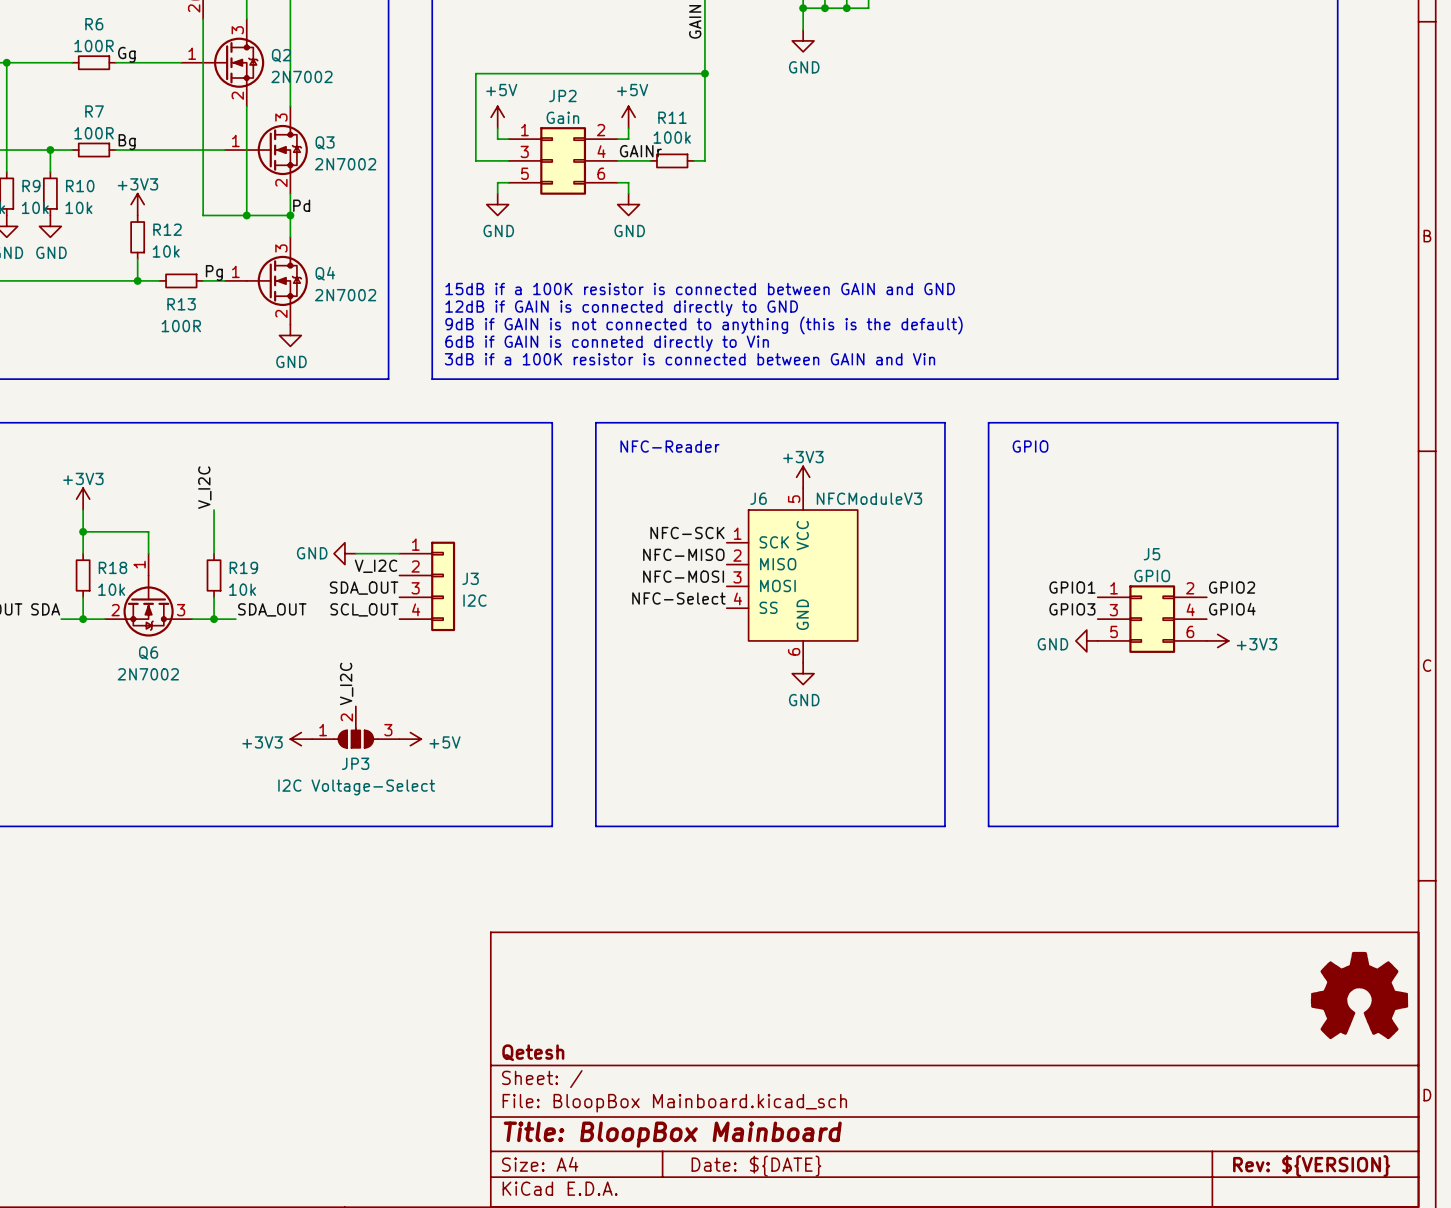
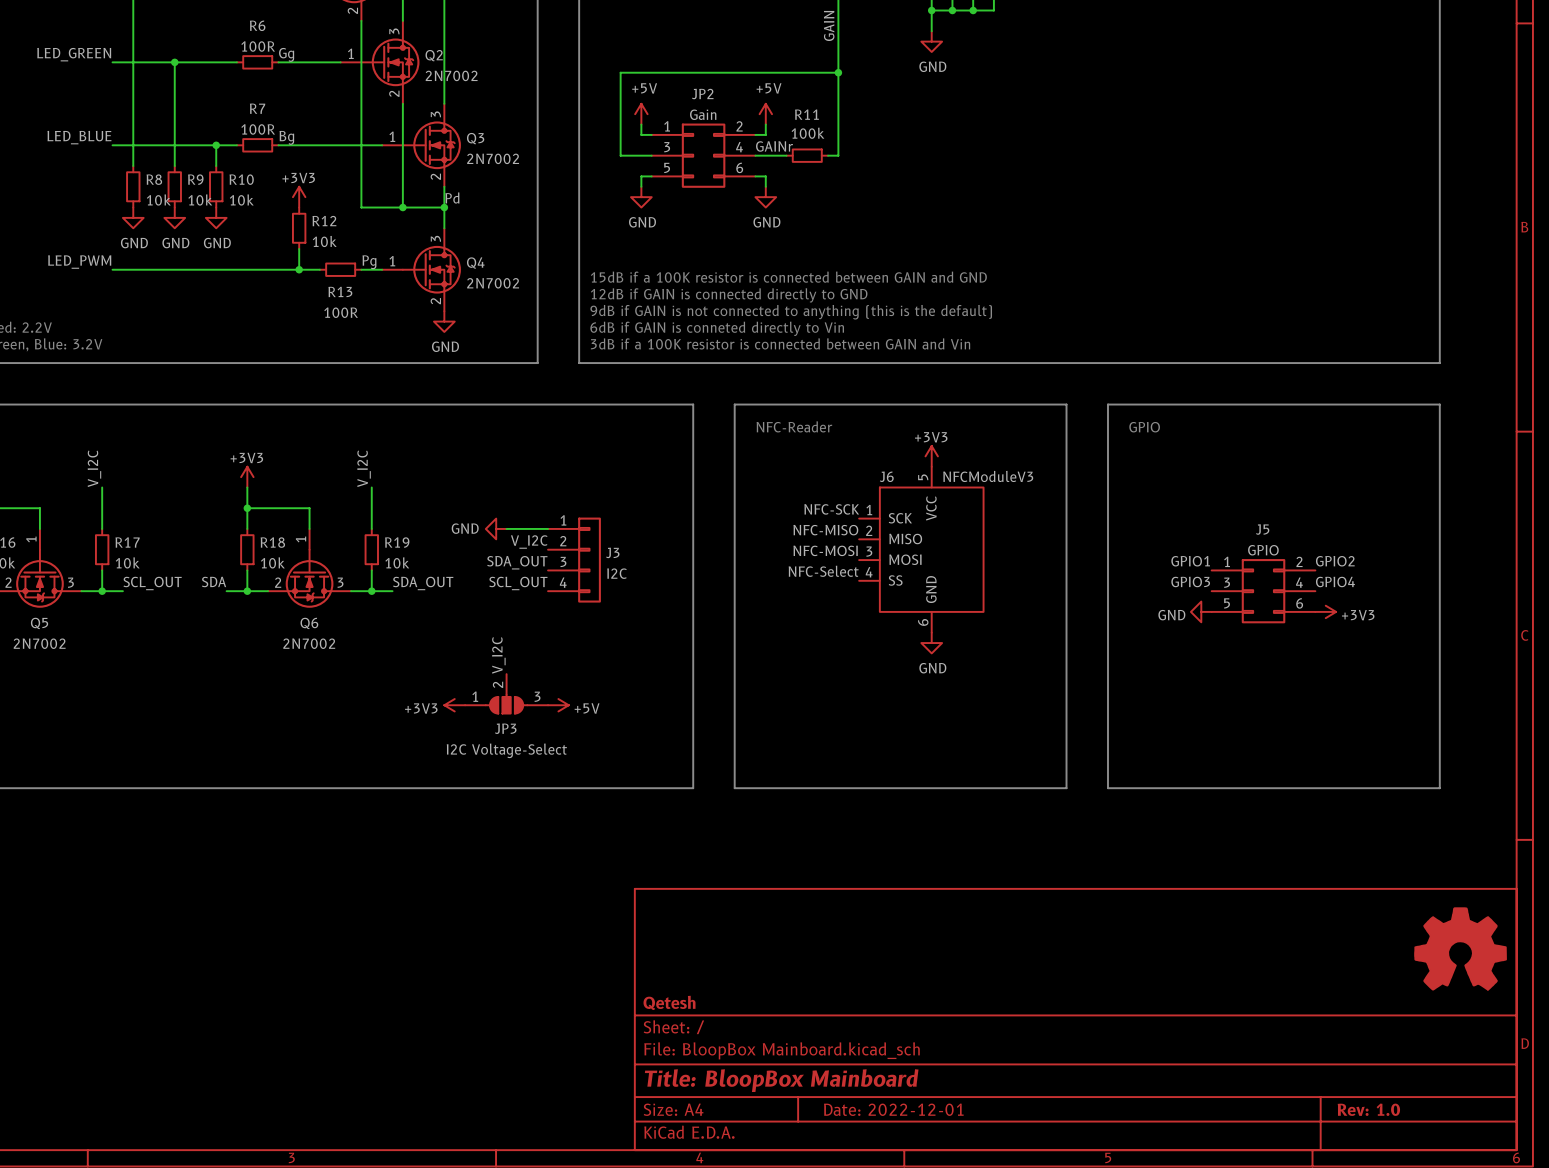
title block: Date: ${DATE} (756, 1166) -> Date: 2022-12-01 (893, 1109)
title block: Rev: ${VERSION} (1311, 1166) -> Rev: 1.0 (1368, 1109)

